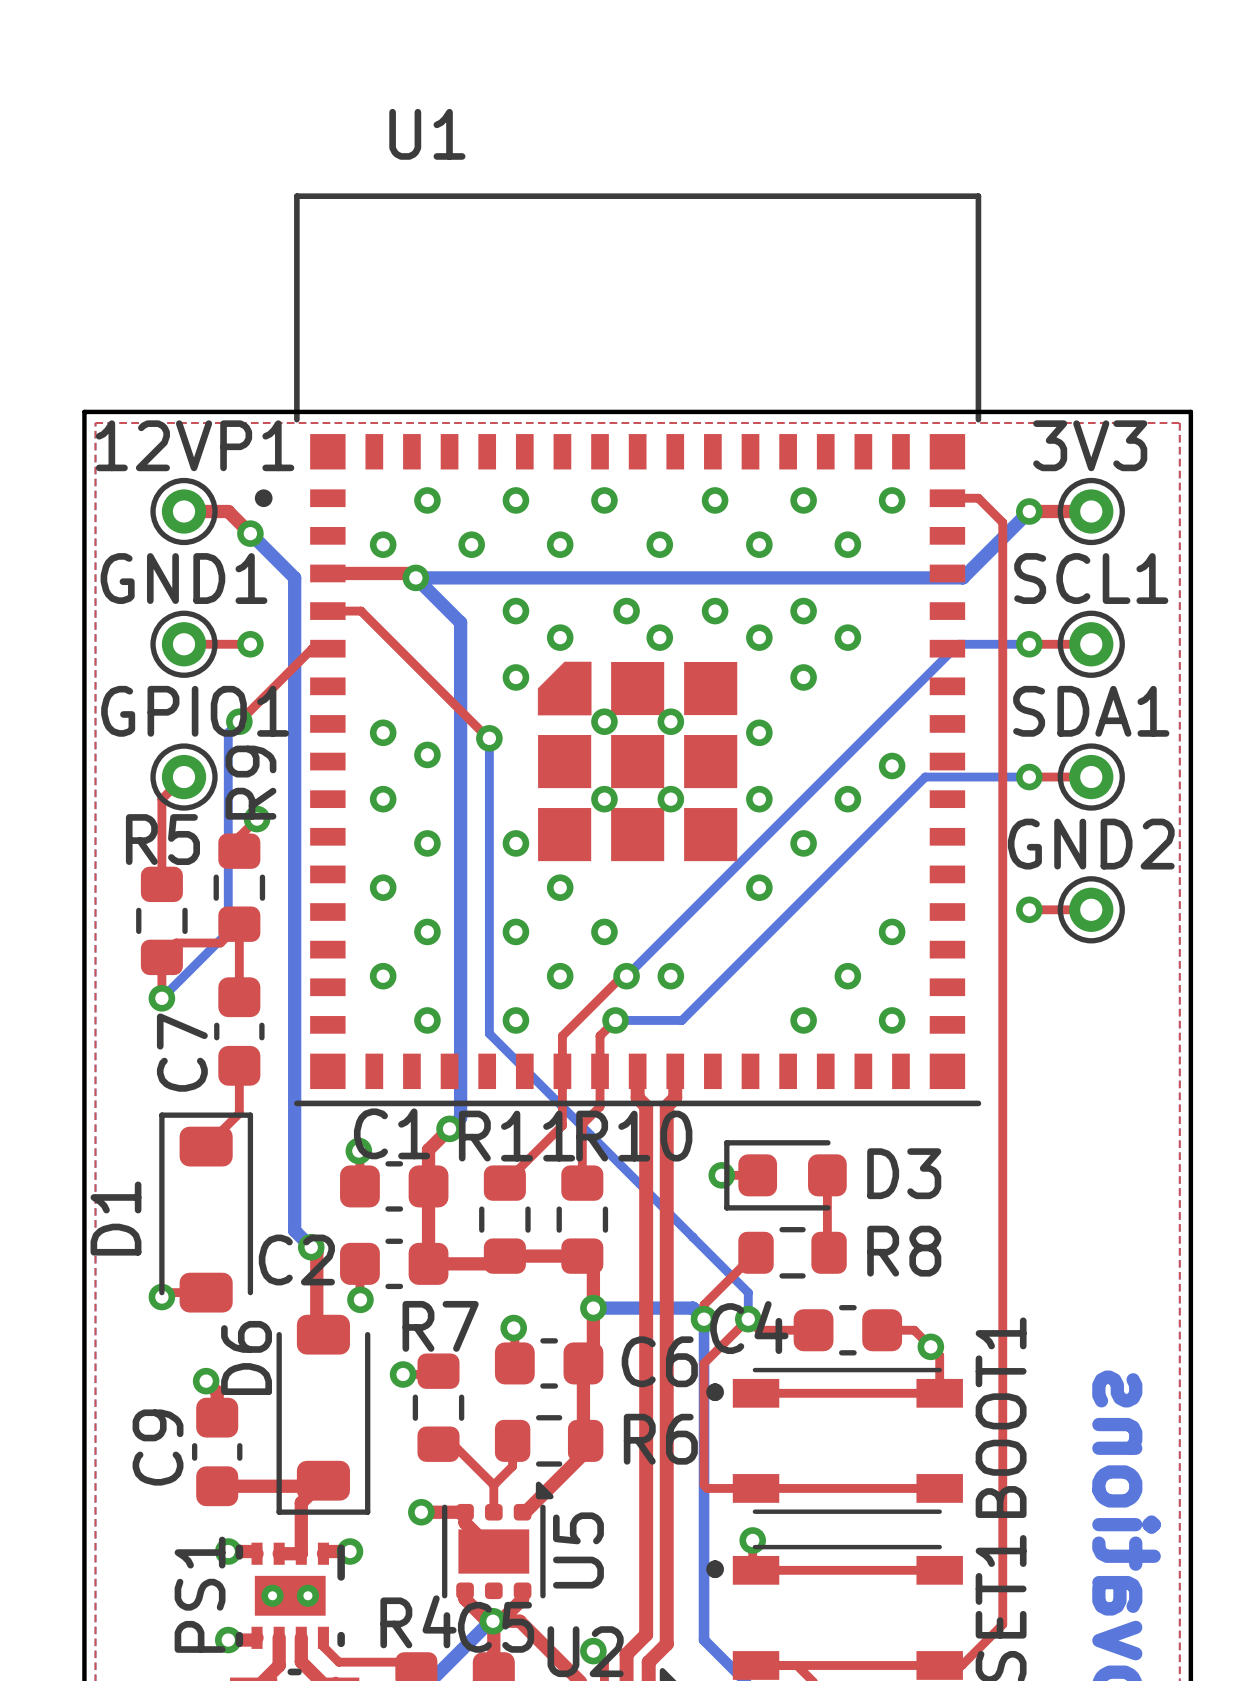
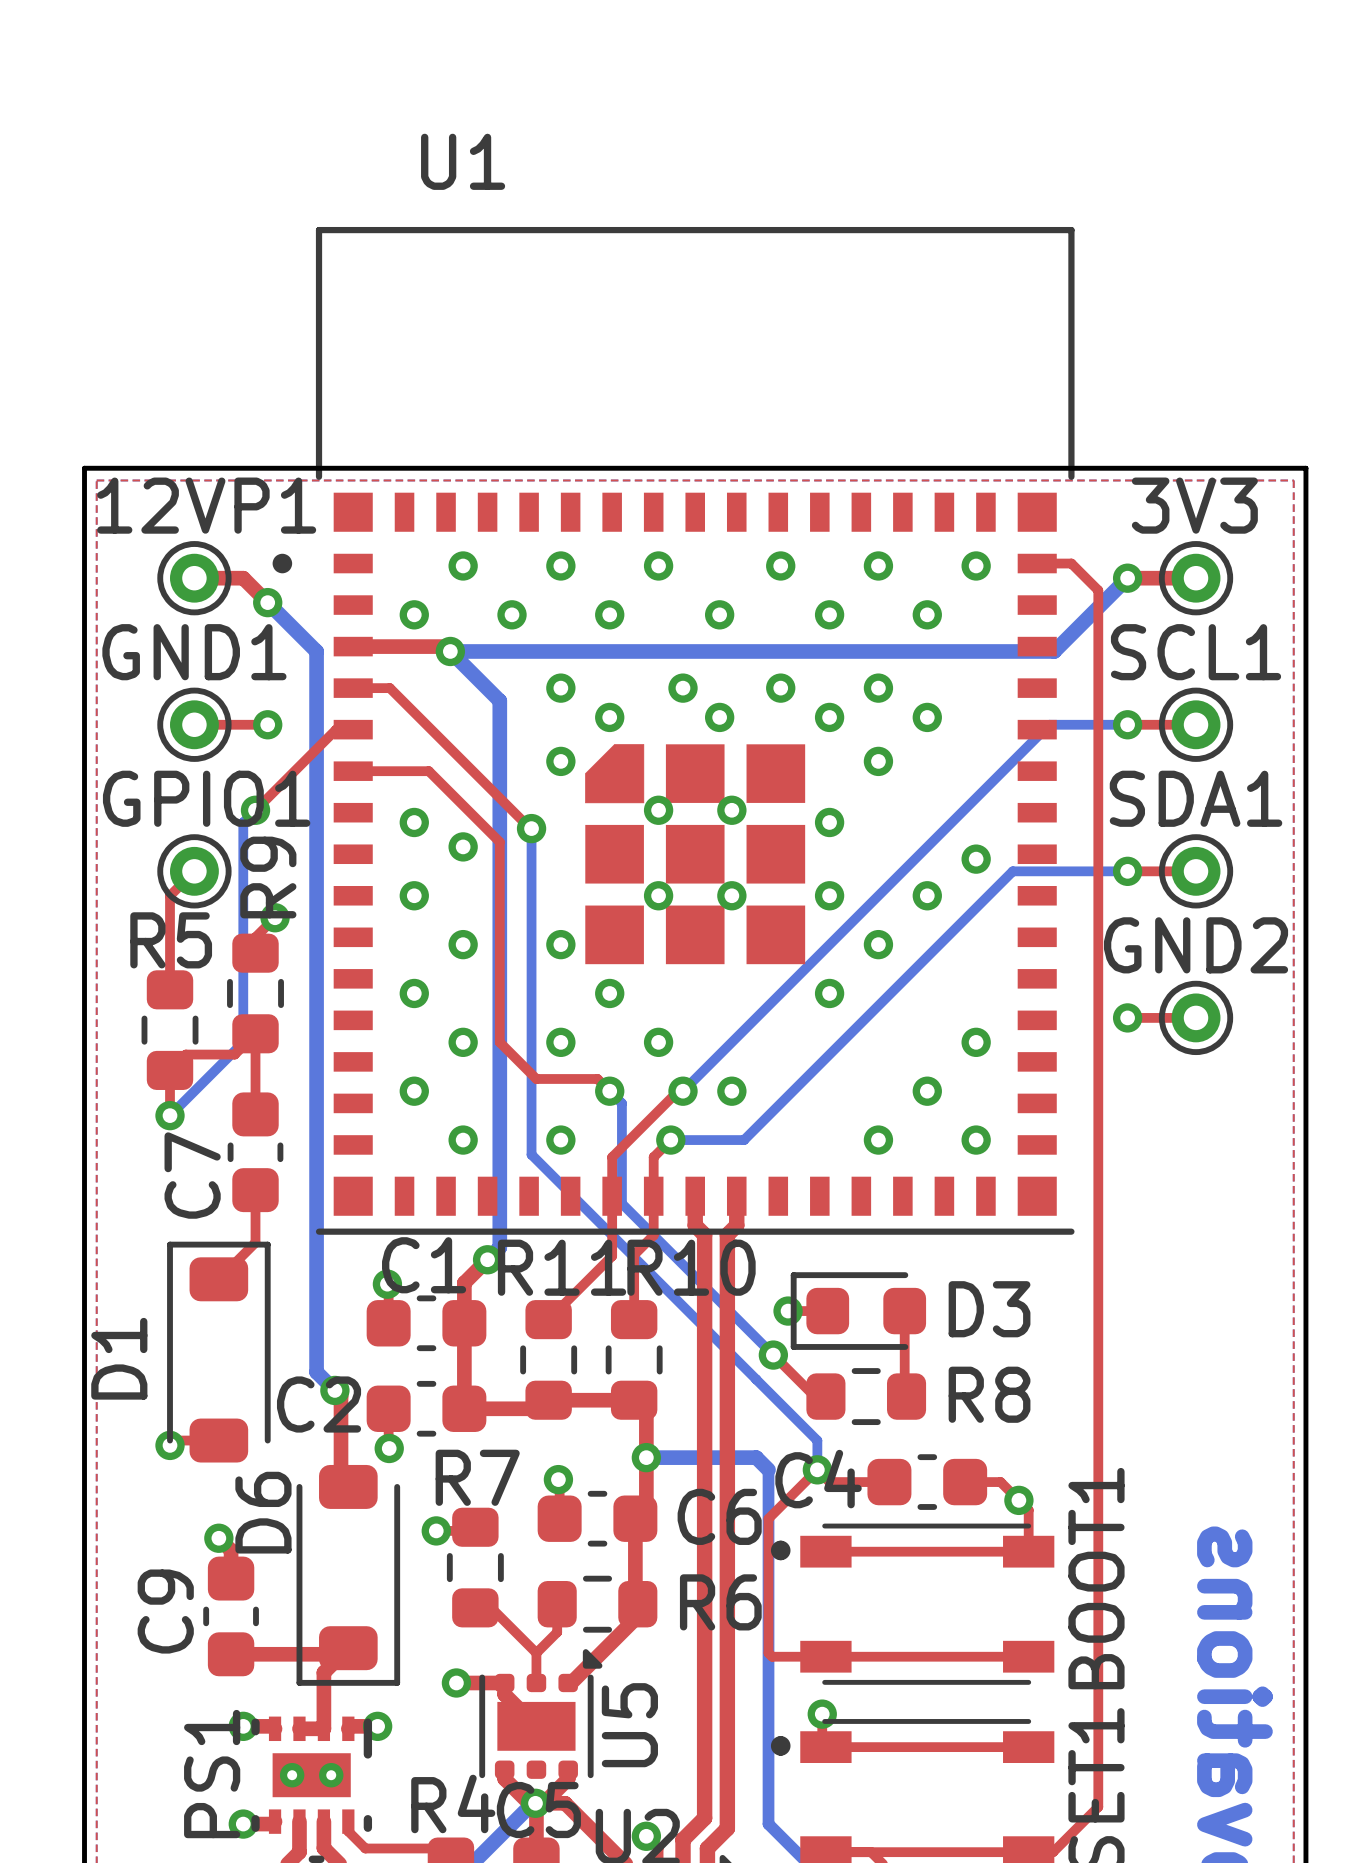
top track: none -> (353, 771) (428, 771) (499, 842) (499, 1042) (536, 1078) (597, 1078) (609, 1091)
bottom track: none -> (609, 1091) (621, 1103) (621, 1203) (773, 1355)
top track: (756, 1252) (704, 1304) (704, 1319) -> (825, 1396) (814, 1396) (773, 1355)
via position: (704, 1319) -> (773, 1355)

